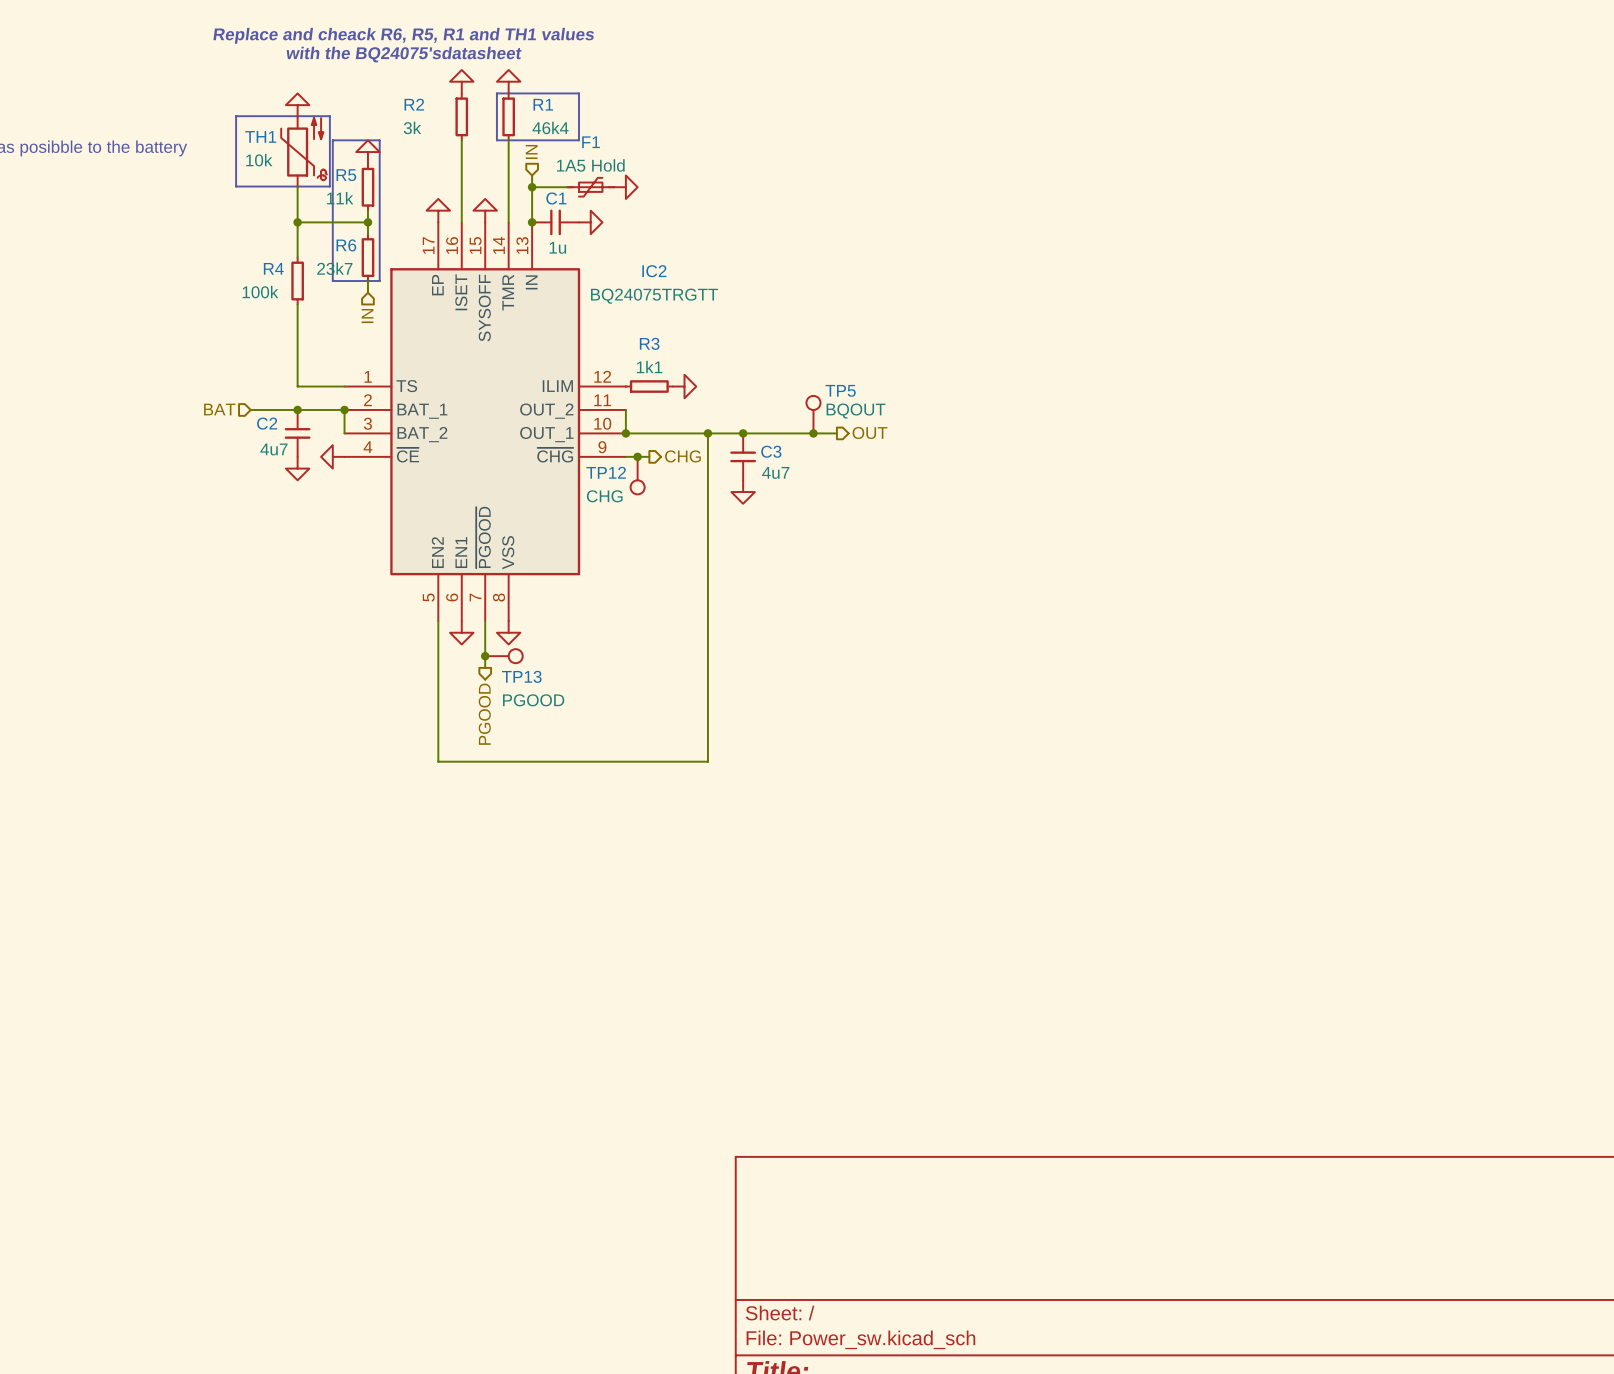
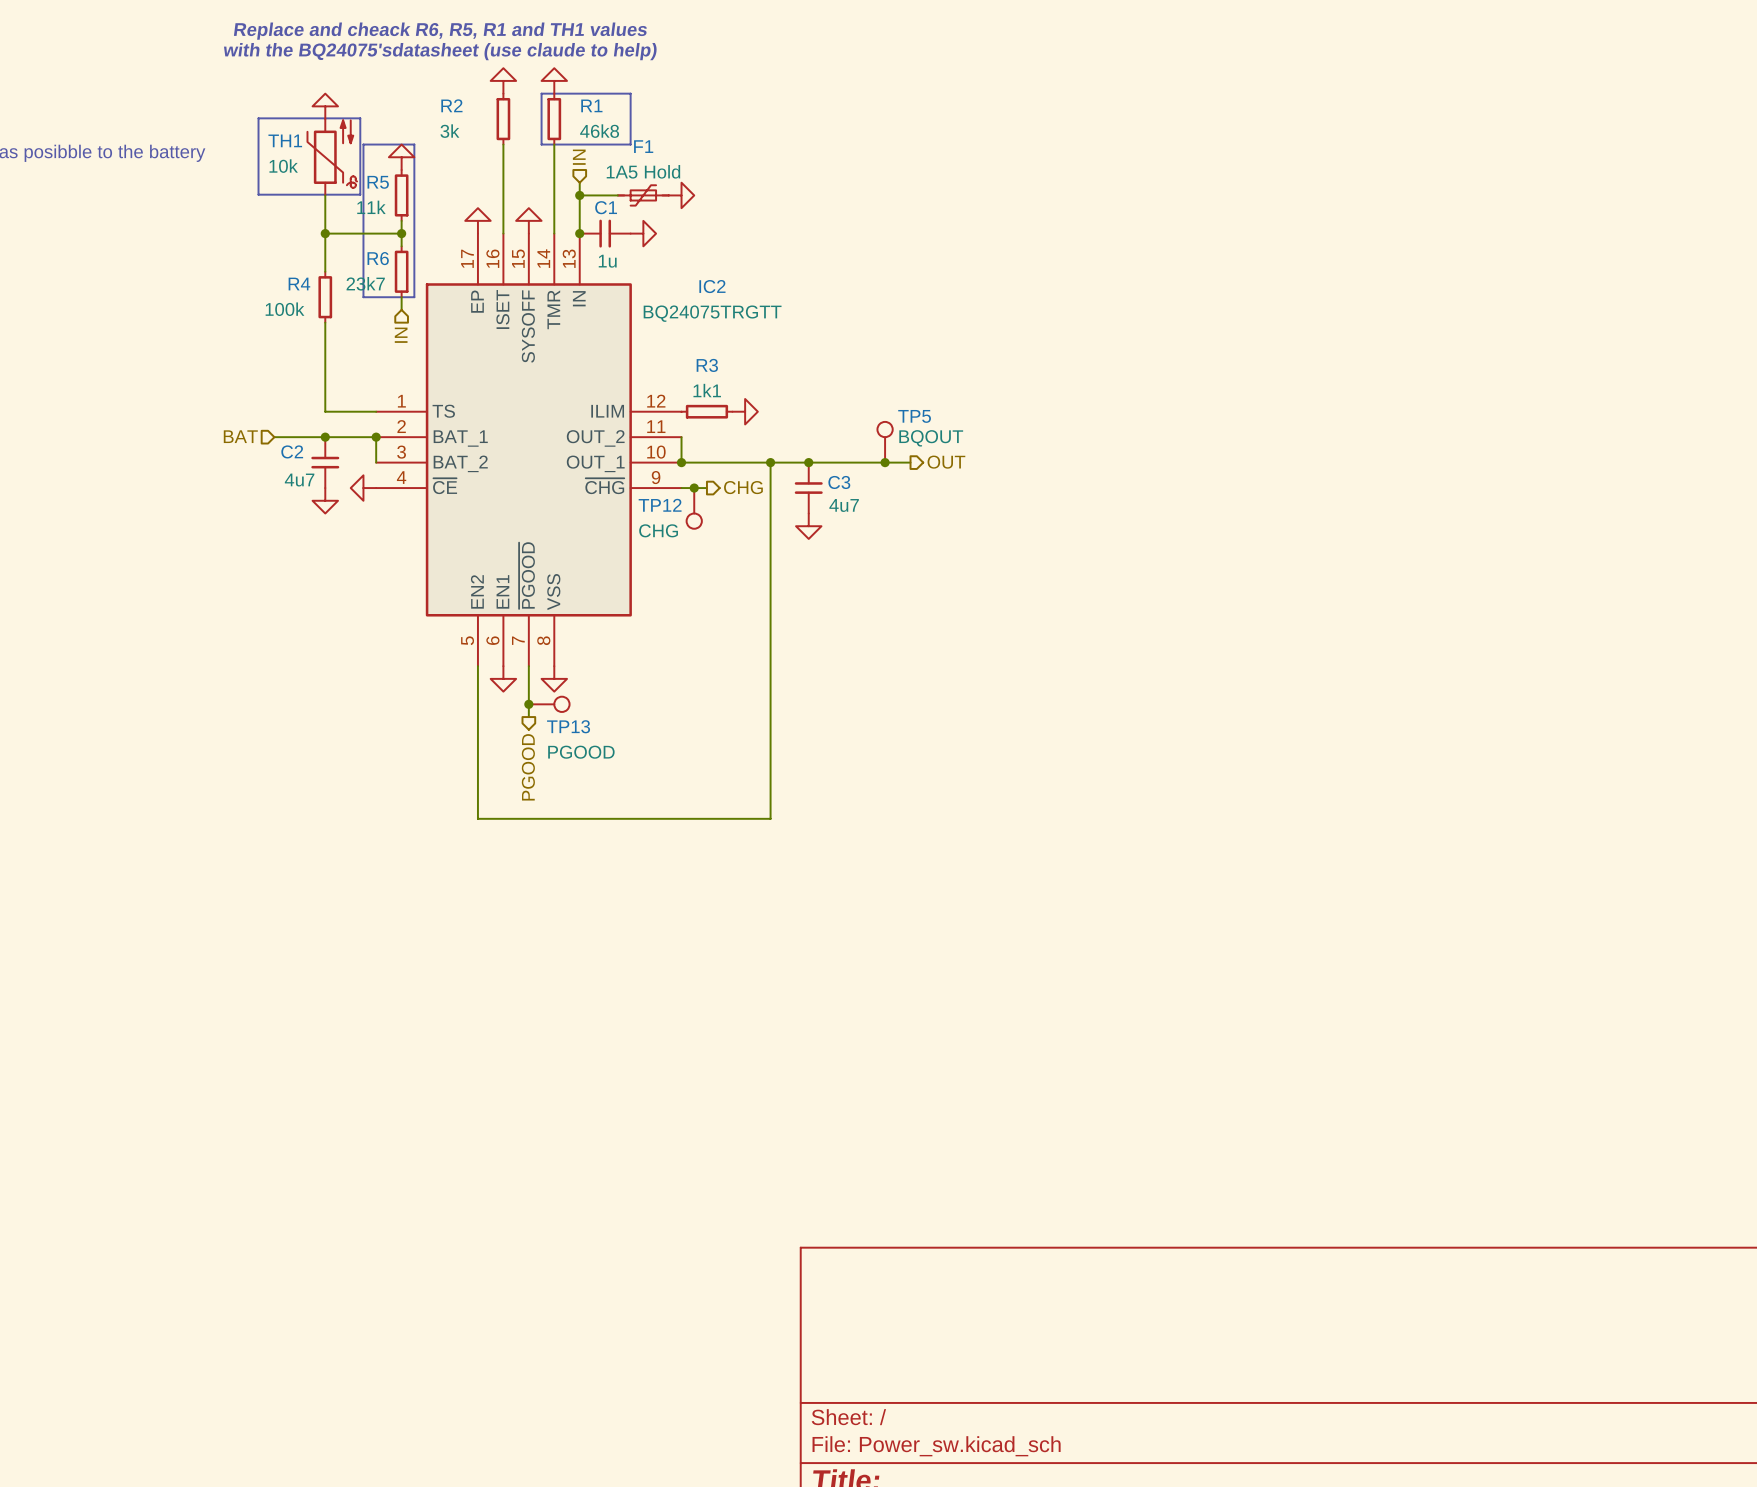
text: with the BQ24075'sdatasheet (404, 54) -> with the BQ24075'sdatasheet (use claude to help) (440, 51)
R1 value: 46k4 (550, 127) -> 46k8 (599, 131)

